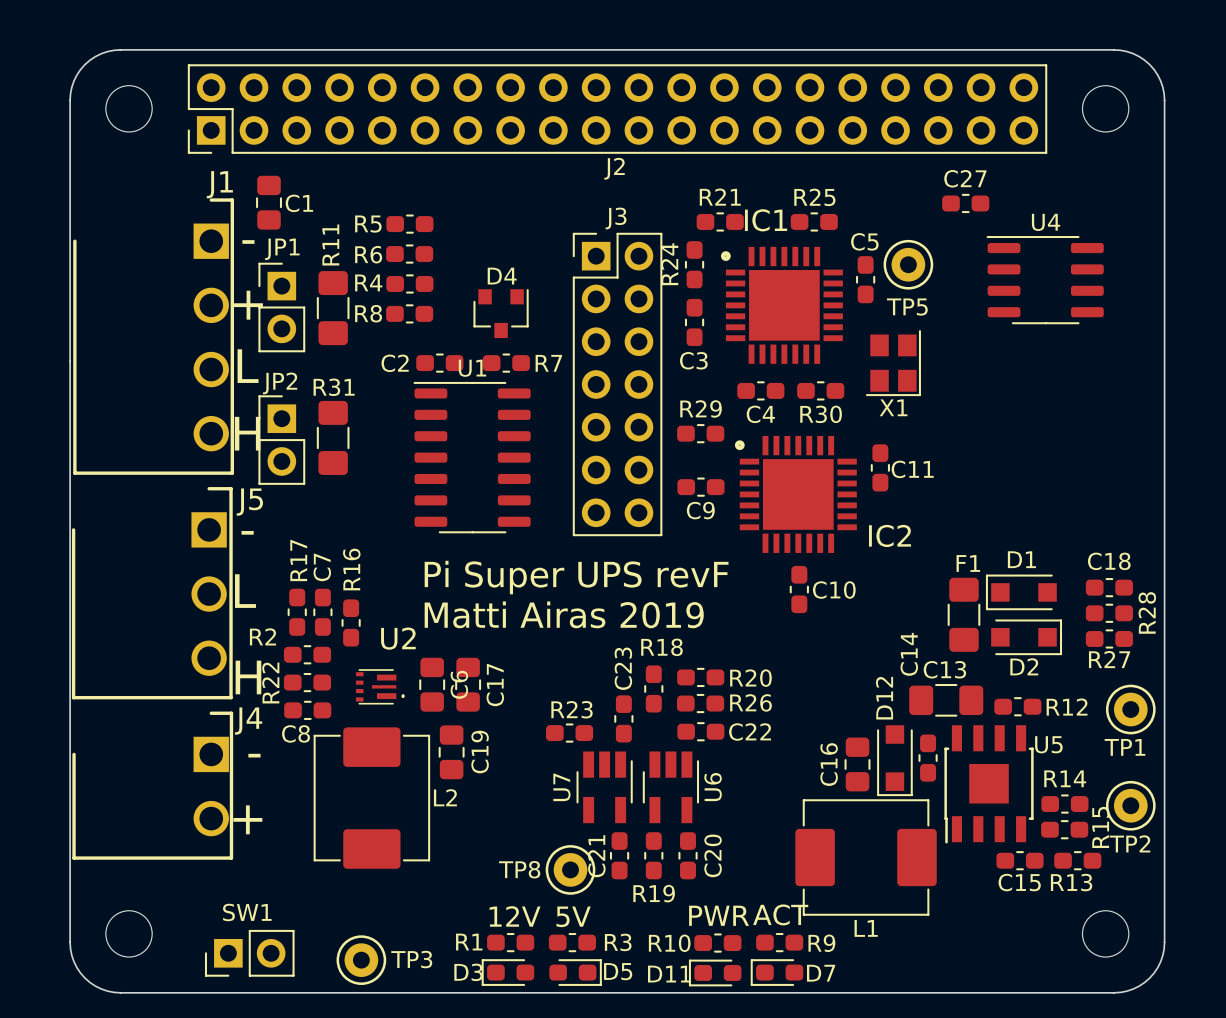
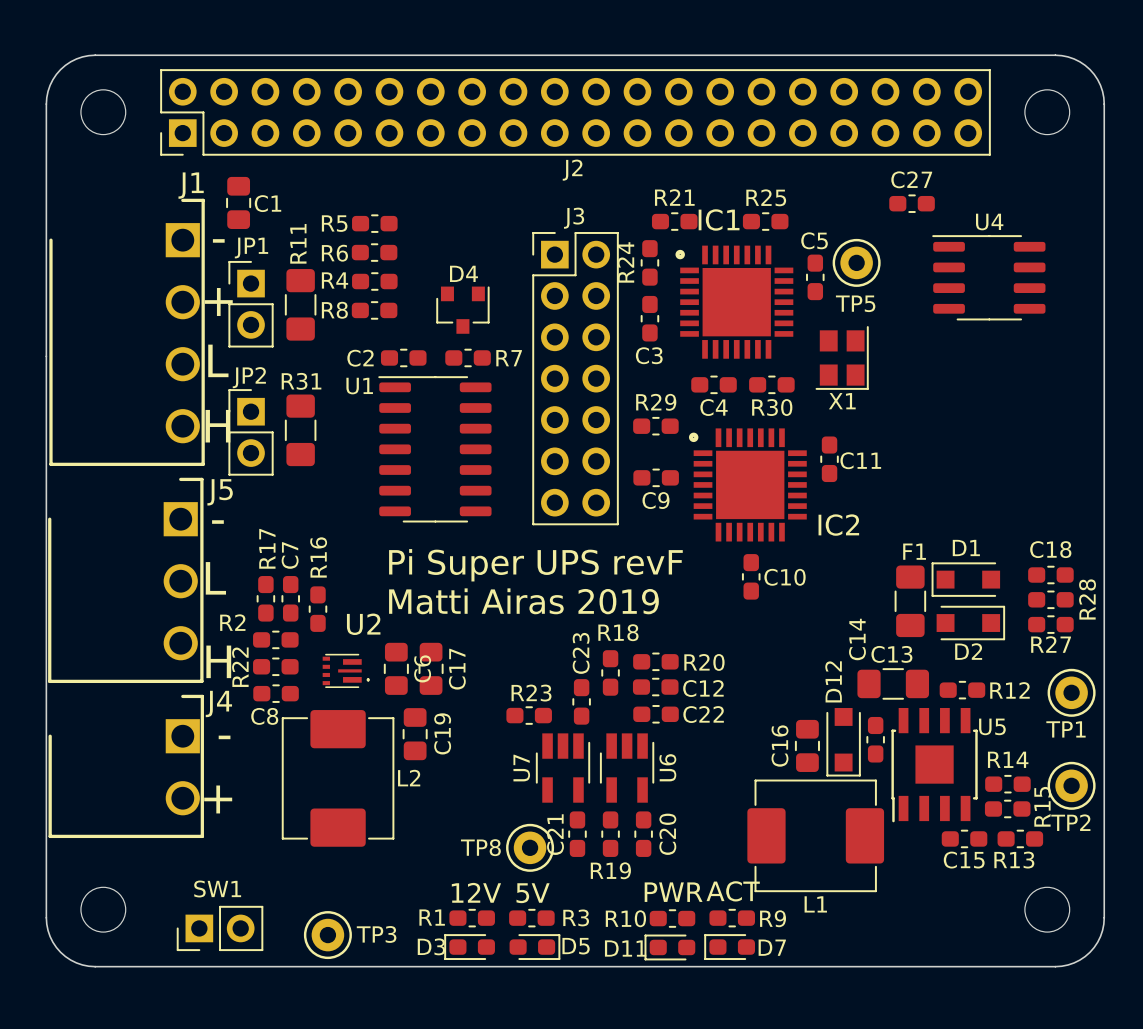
U1 name position: U1 (472, 368) -> U1 (359, 386)
R26 name: R26 (750, 702) -> C12 (703, 688)

